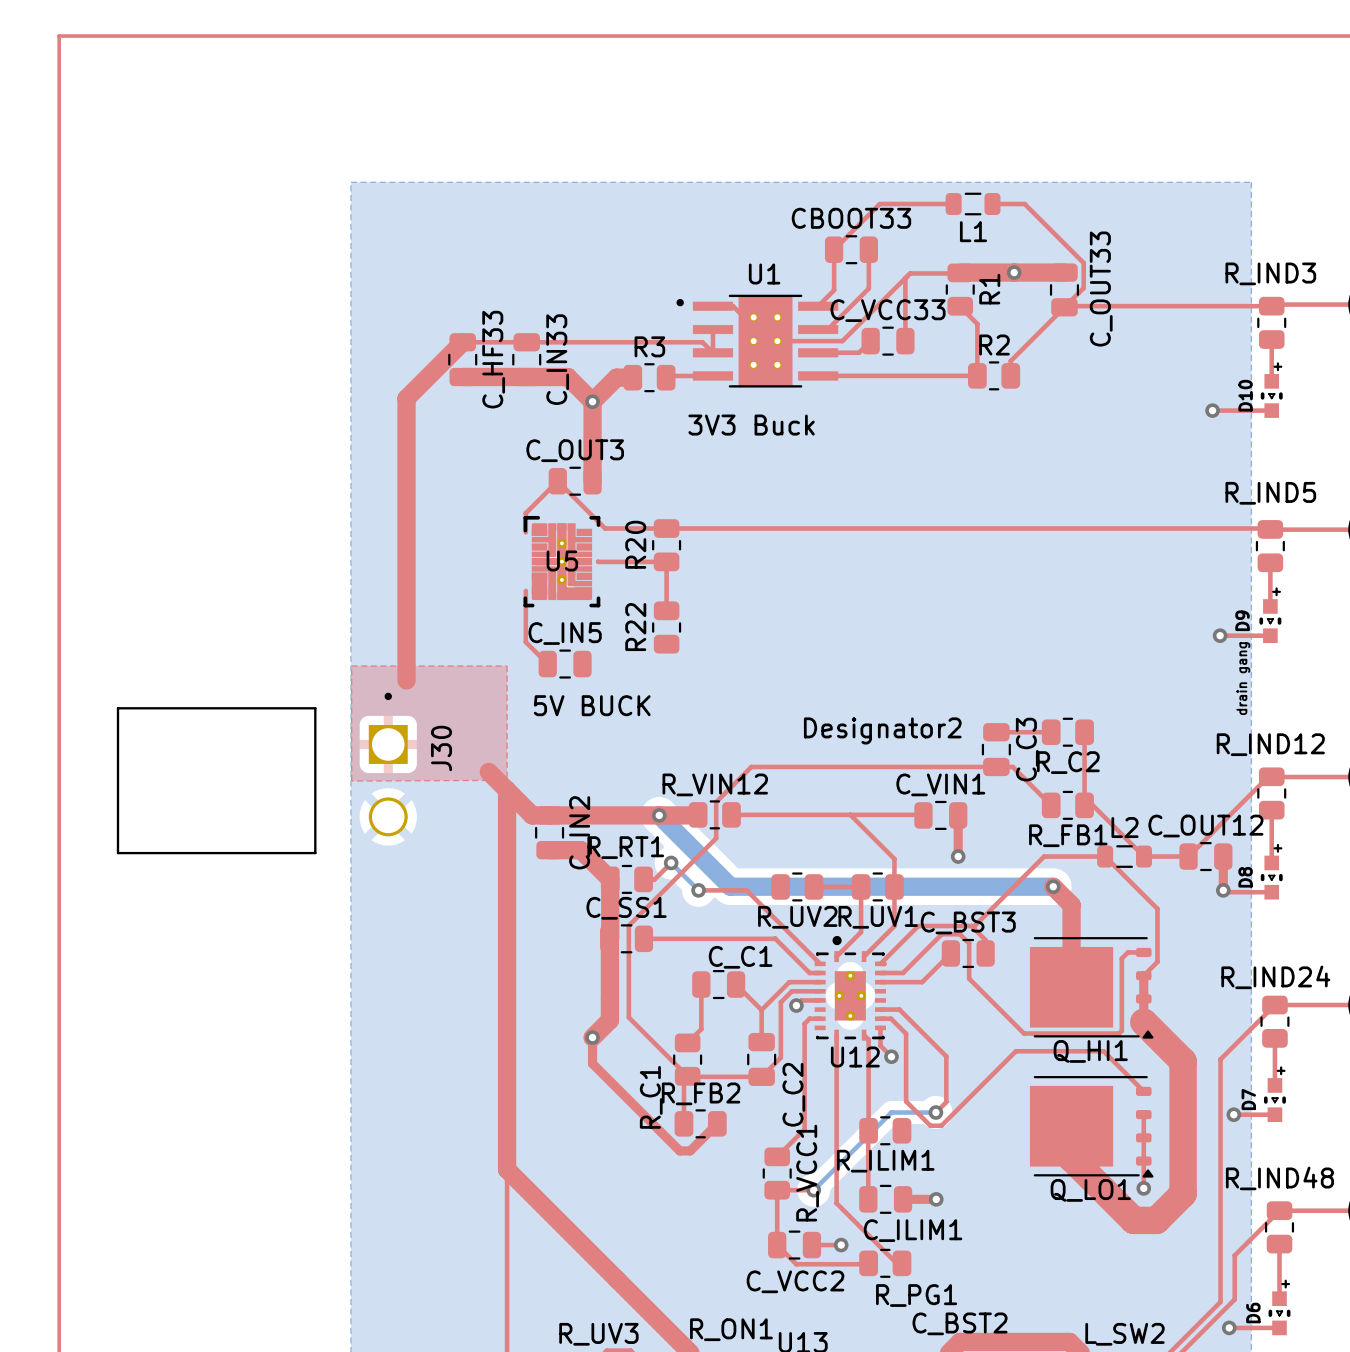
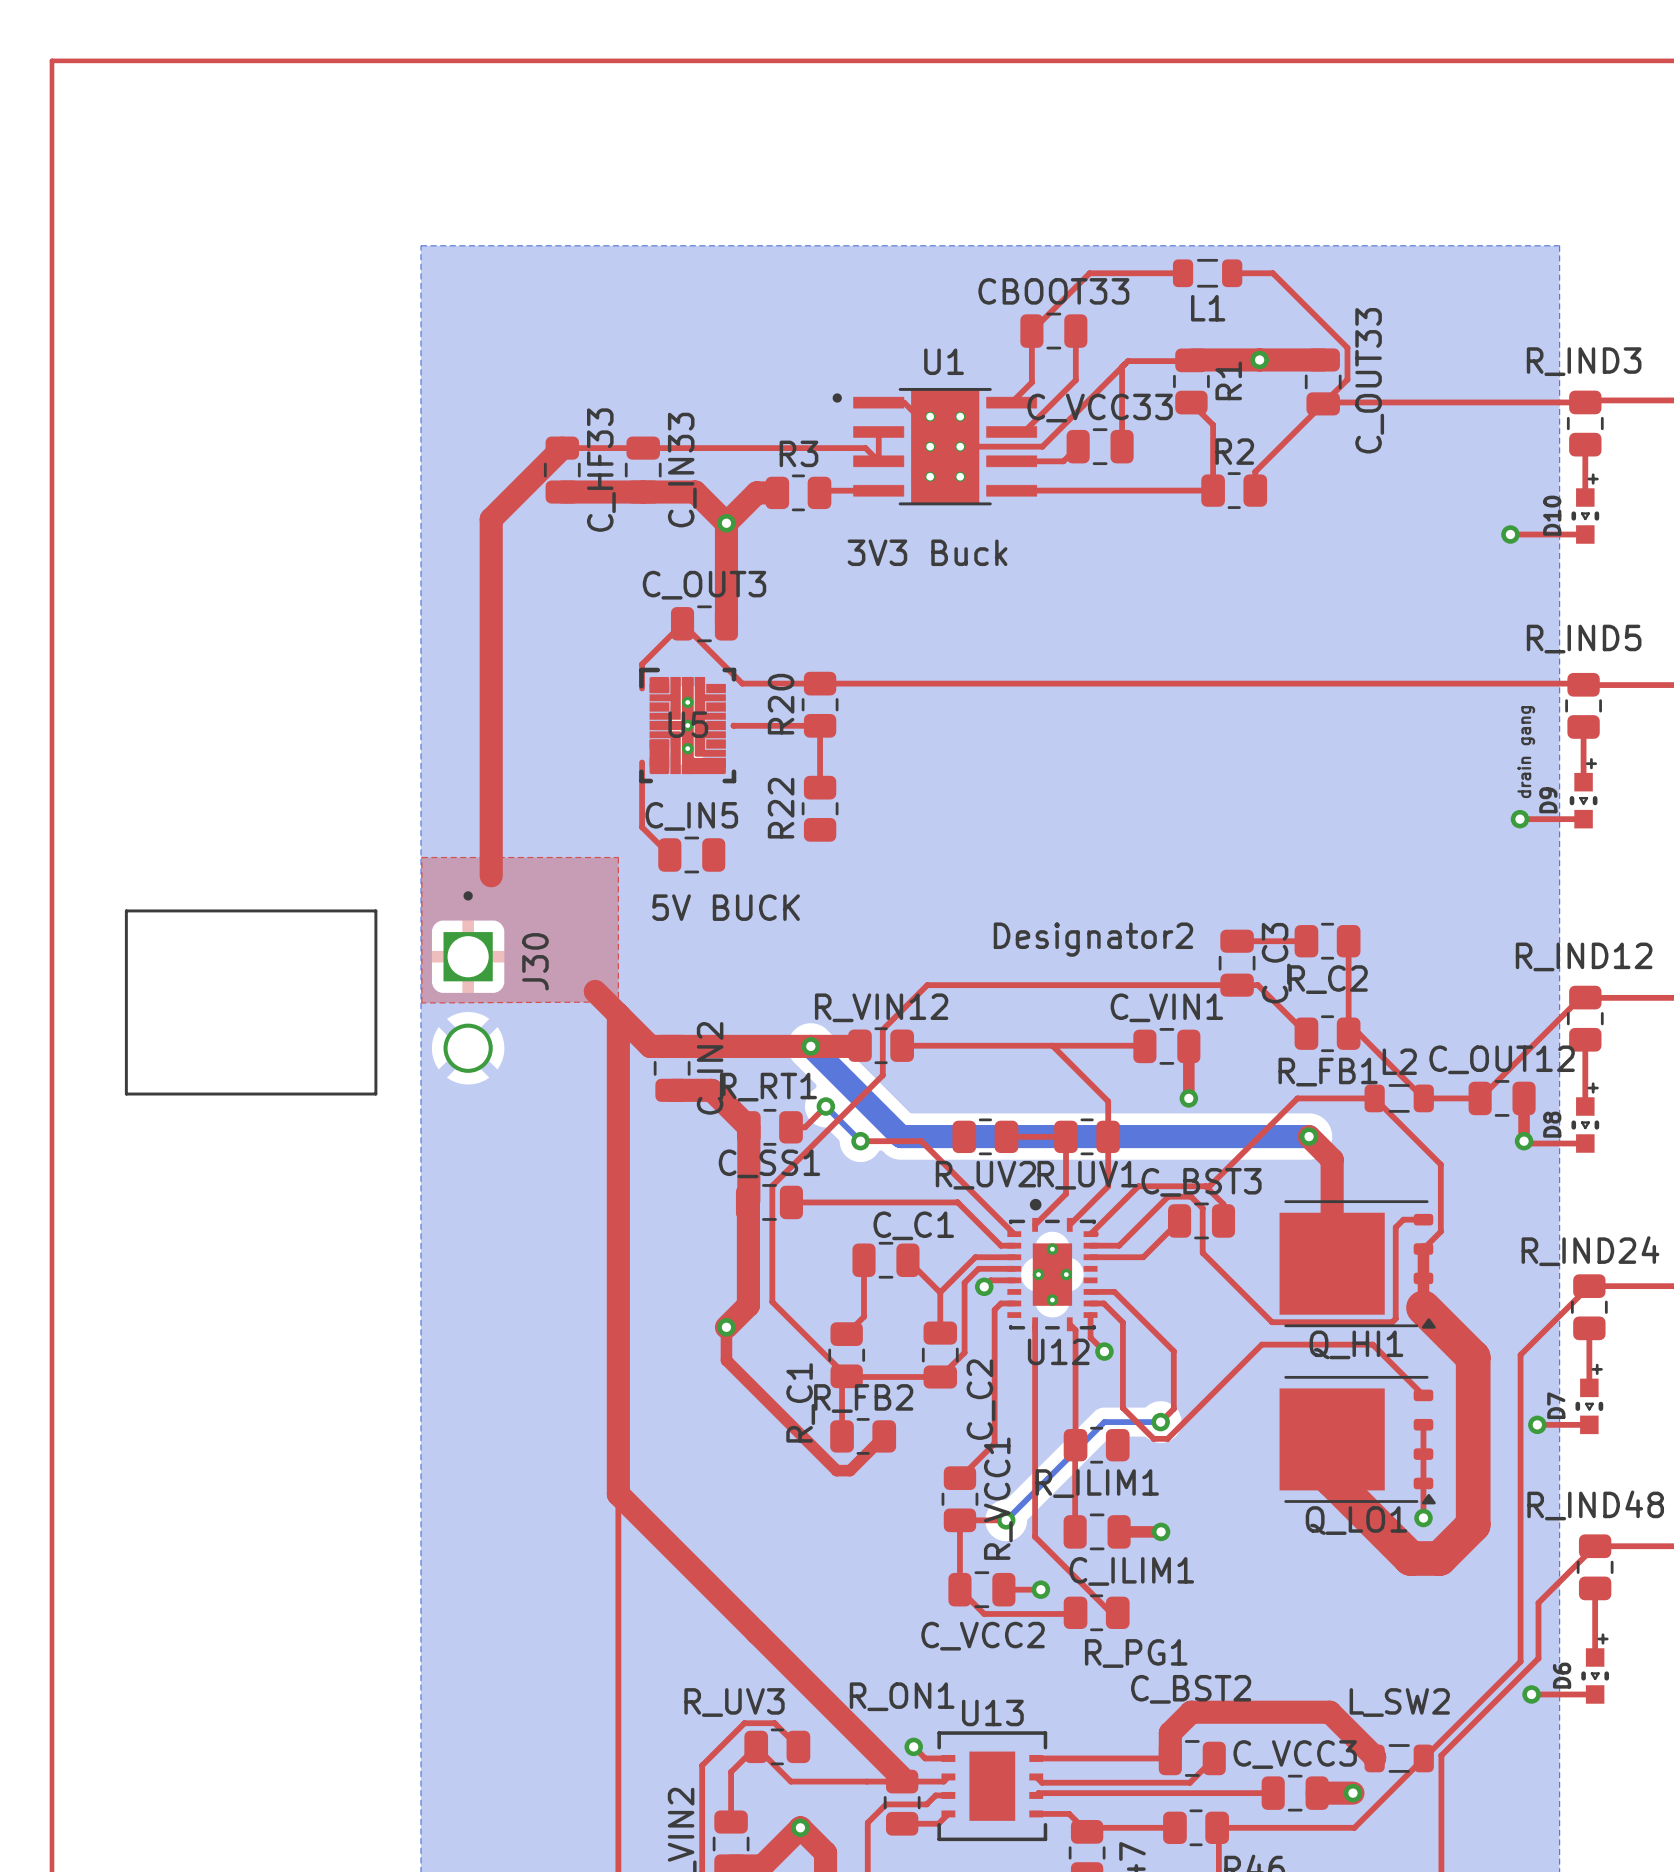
text position: drain gang (1243, 678) -> drain gang (1526, 752)

